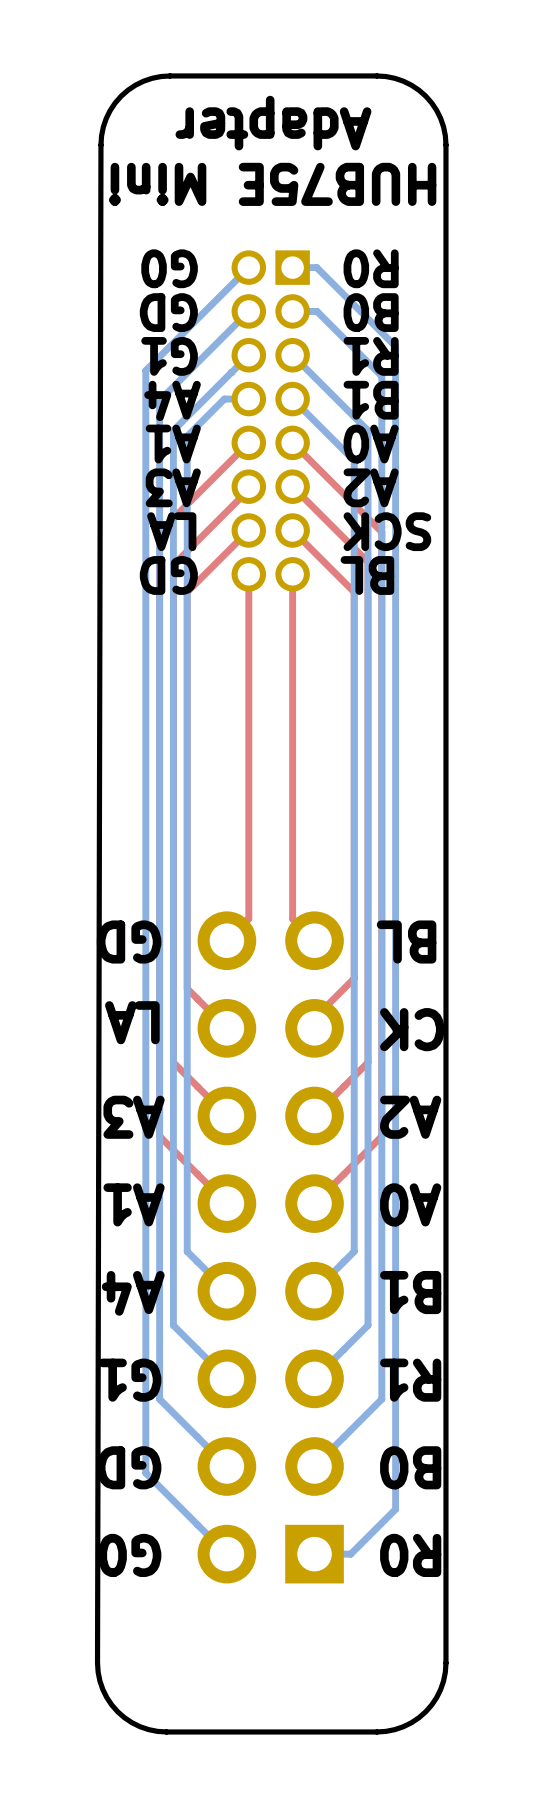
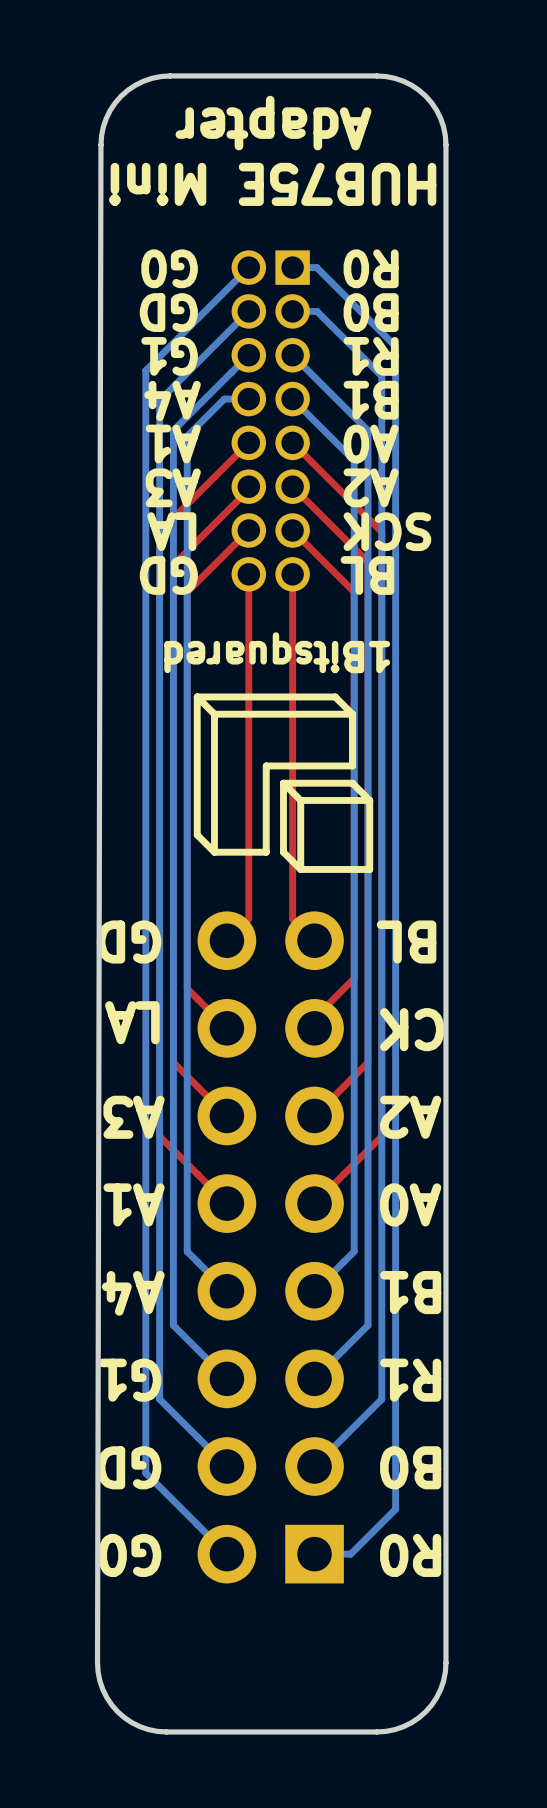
text: none -> 1Bitsquared (277, 652)
drawing: none -> [193, 693, 374, 873]

